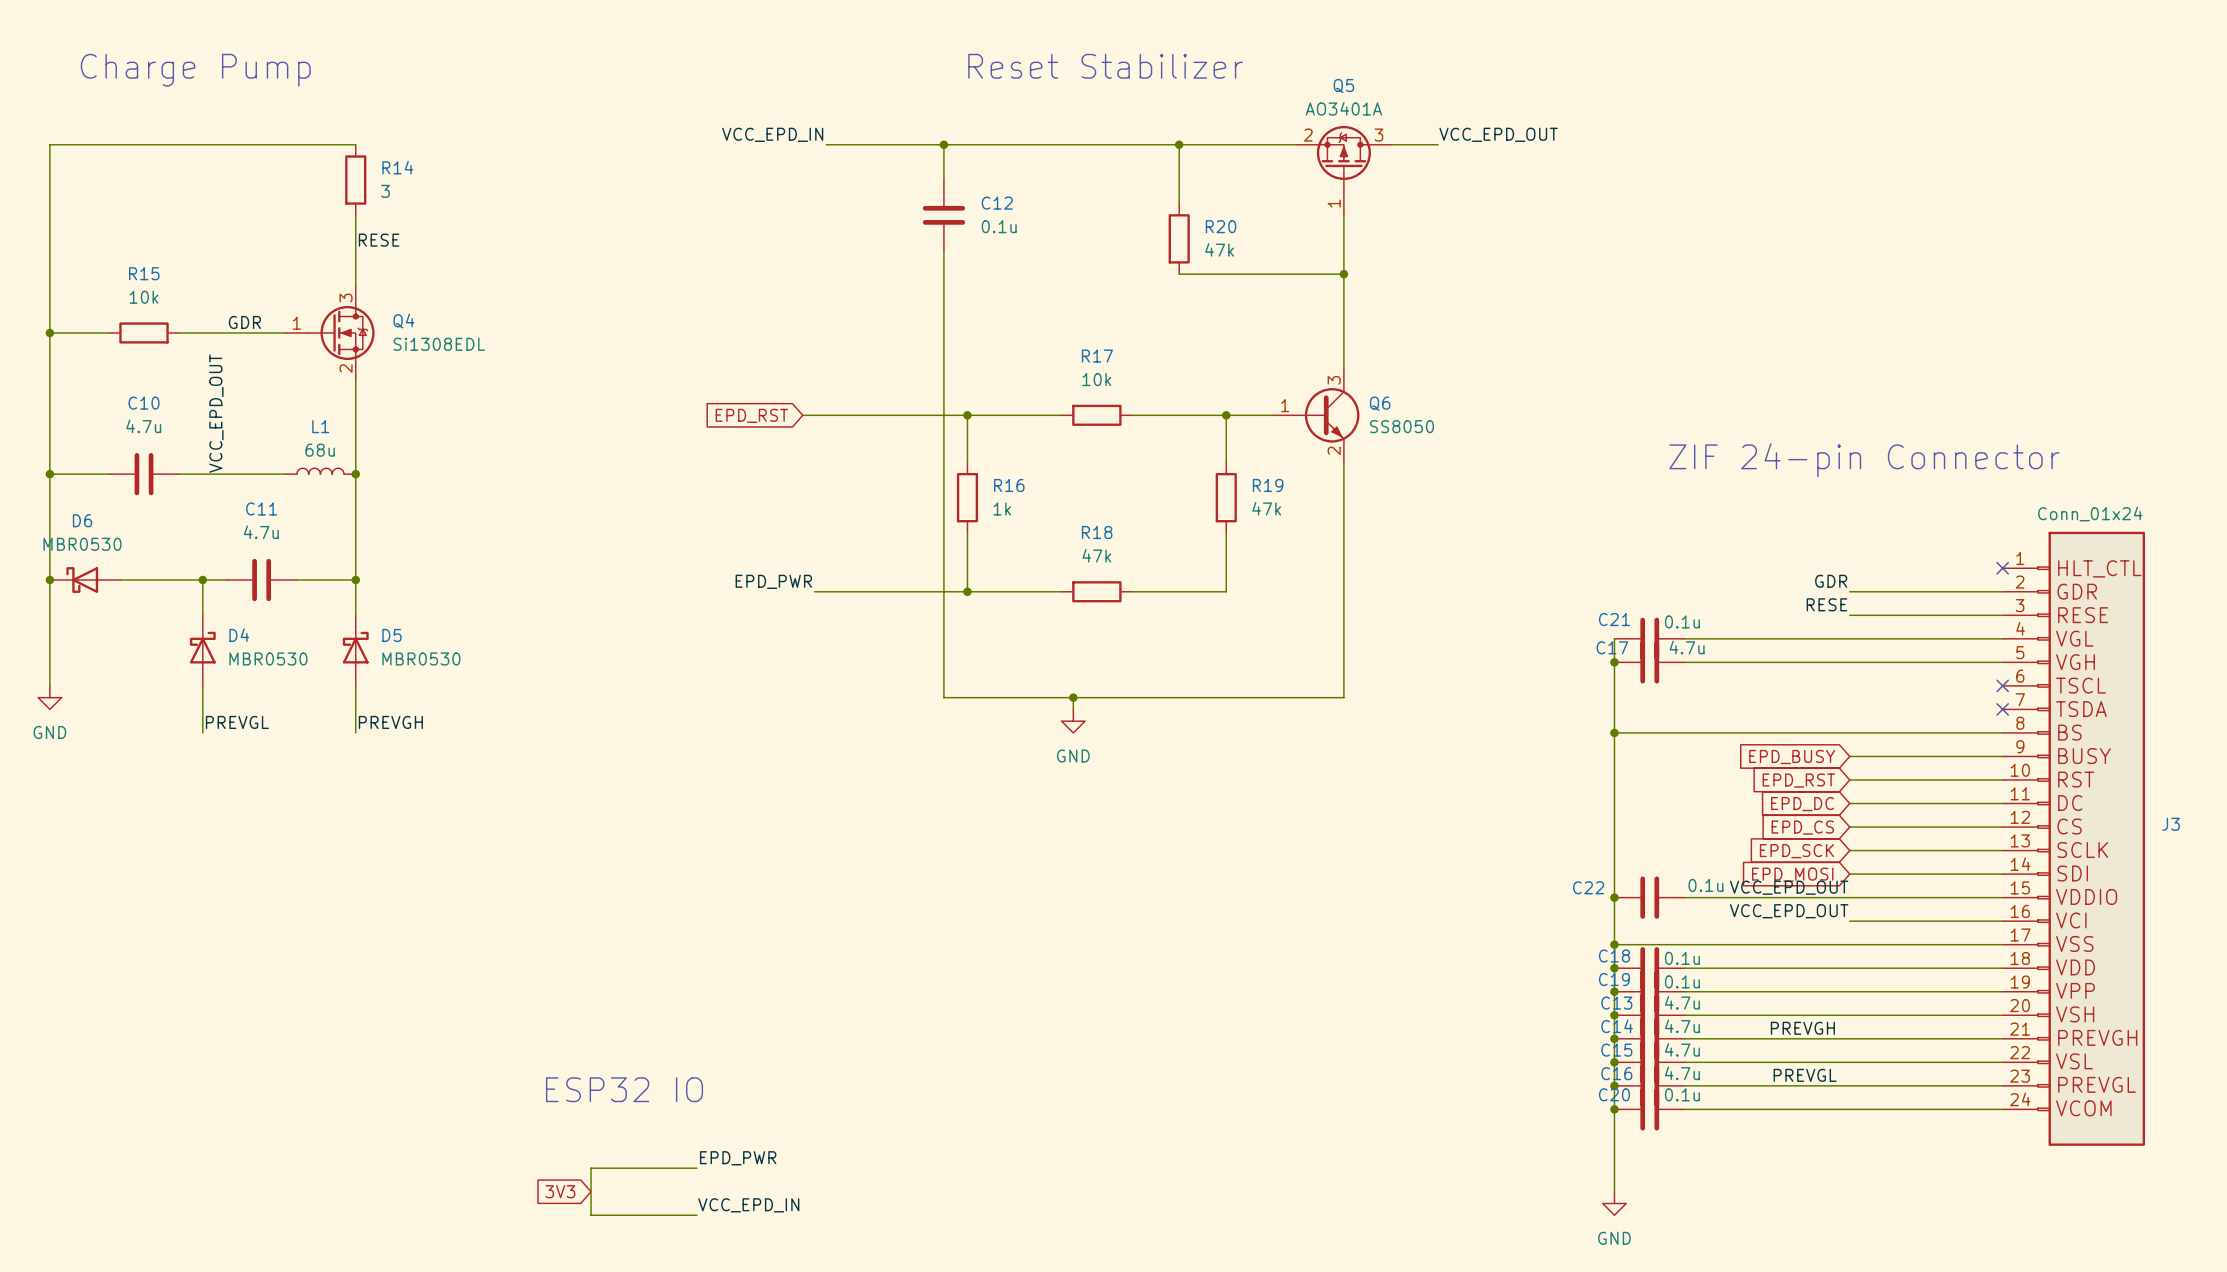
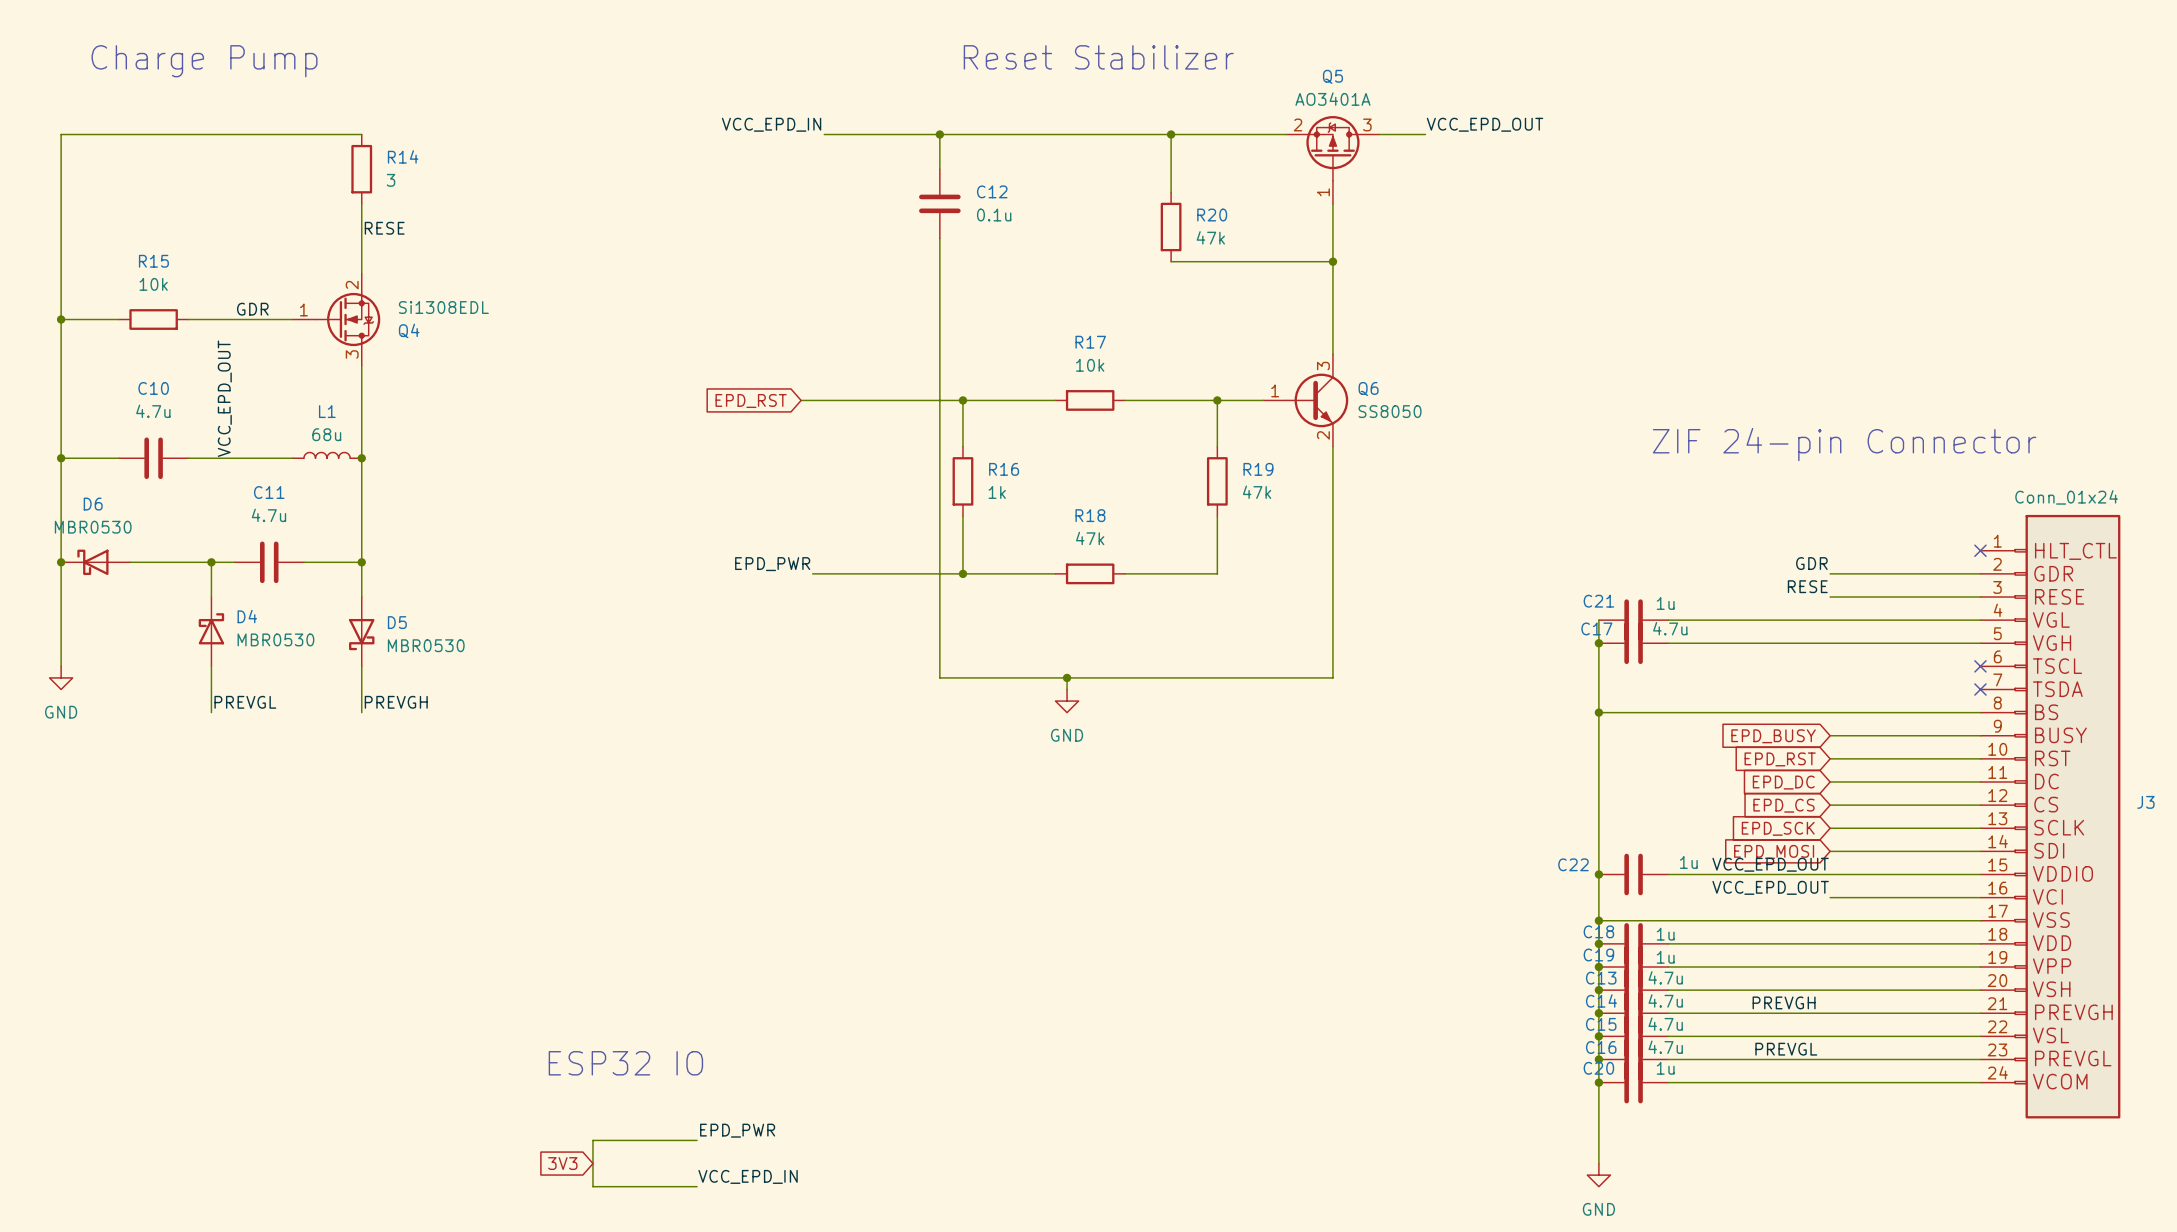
Q4 flip: as is (341, 332) -> up-down (347, 319)
C21 value: 0.1u (1682, 621) -> 1u (1665, 603)
D5 rotation: 0° (355, 647) -> 180° (361, 634)
C22 value: 0.1u (1705, 885) -> 1u (1688, 862)
C18 value: 0.1u (1682, 958) -> 1u (1665, 934)
C19 value: 0.1u (1682, 981) -> 1u (1665, 957)
C20 value: 0.1u (1682, 1094) -> 1u (1665, 1068)

